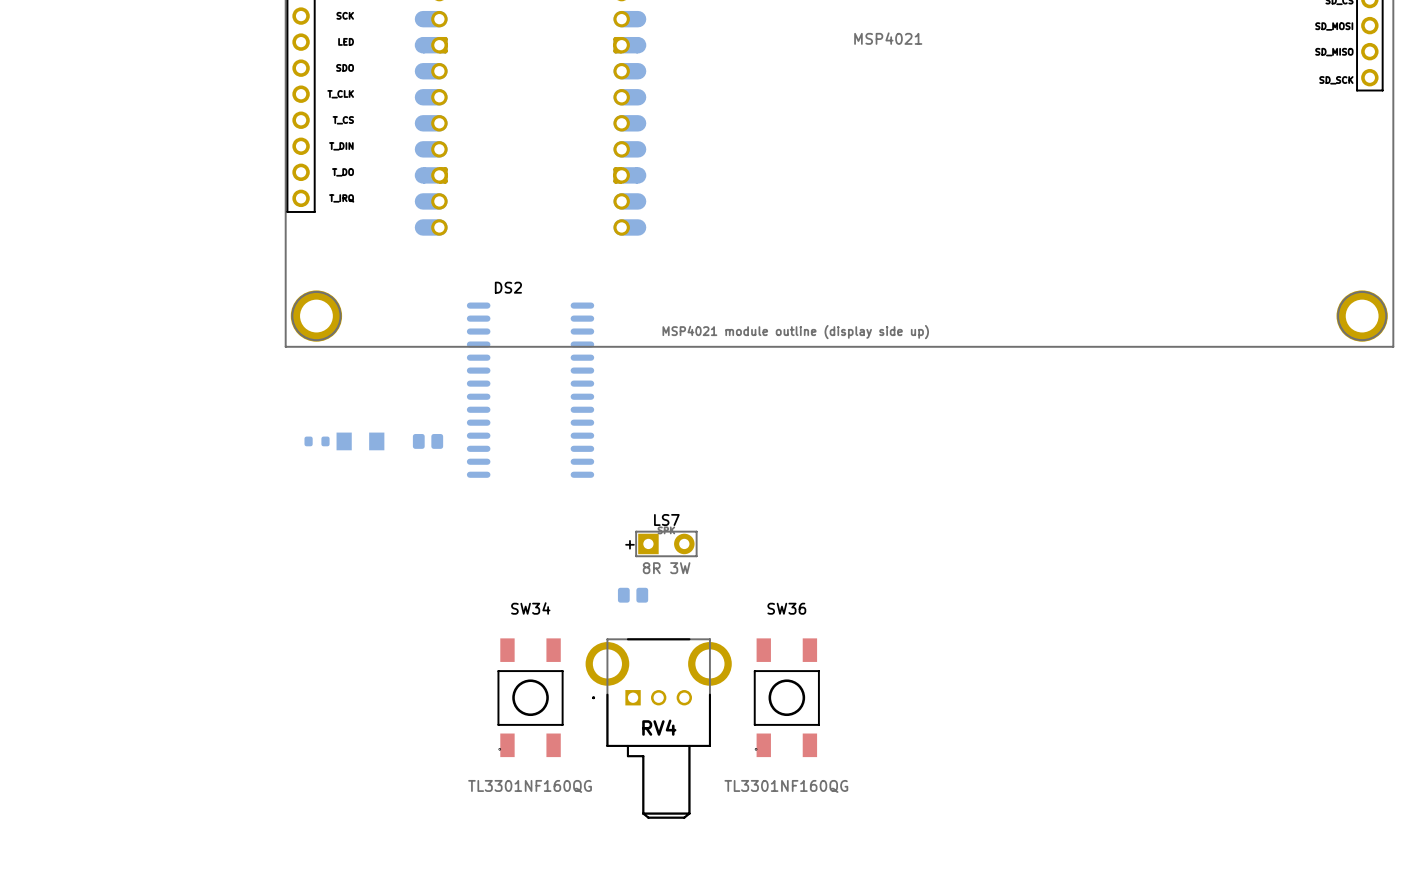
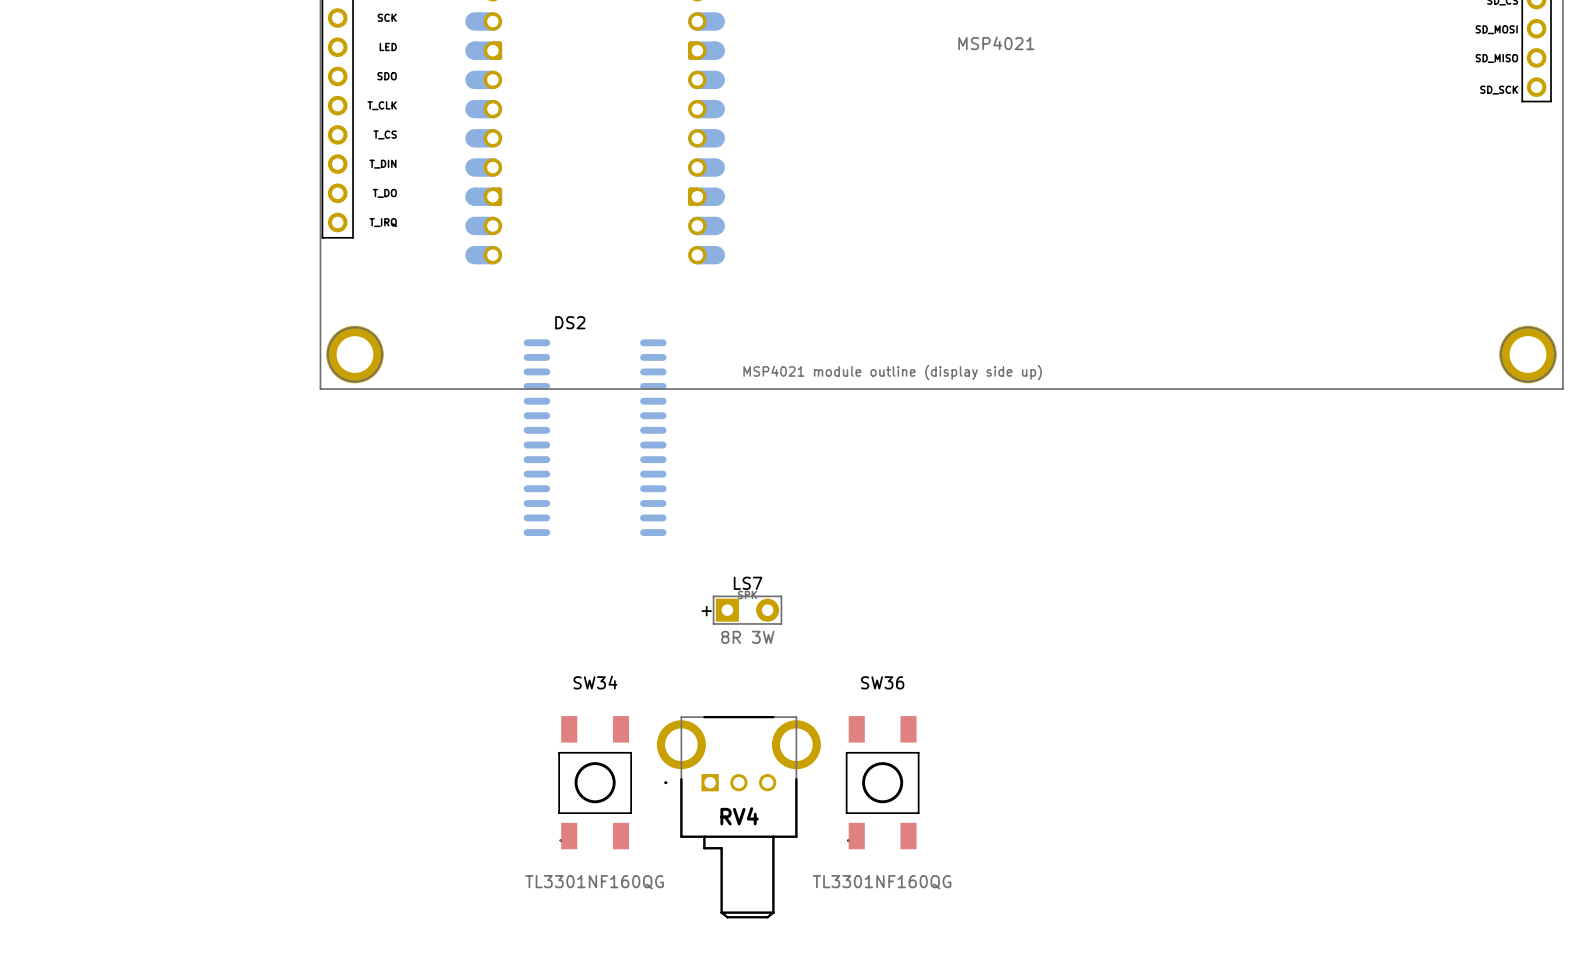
part: (317, 441) -> none
part: (360, 441) -> none
part: (428, 441) -> none
part: (633, 595) -> none

